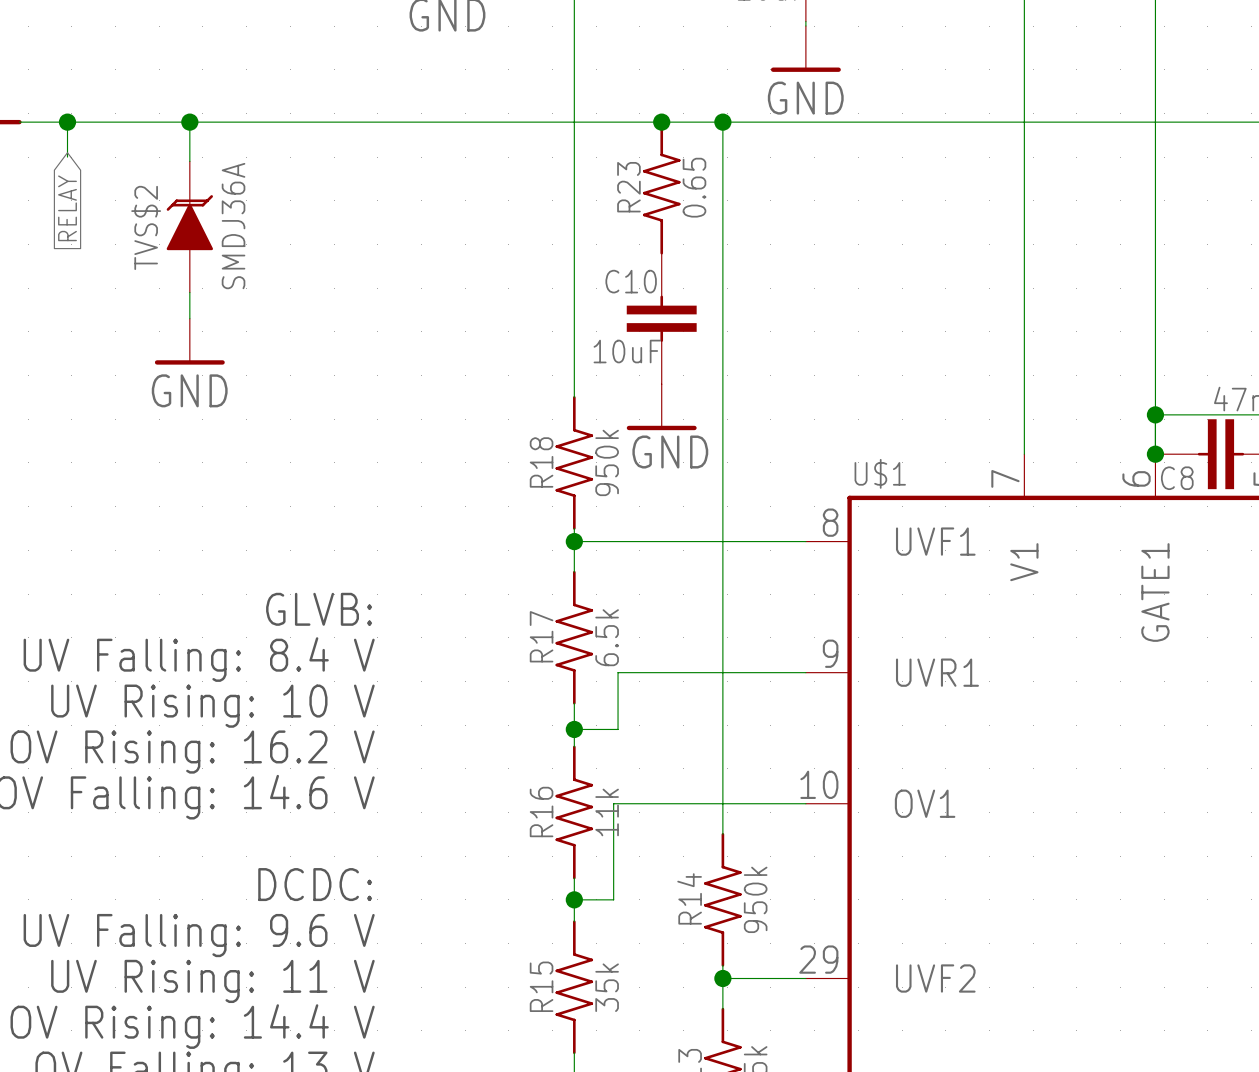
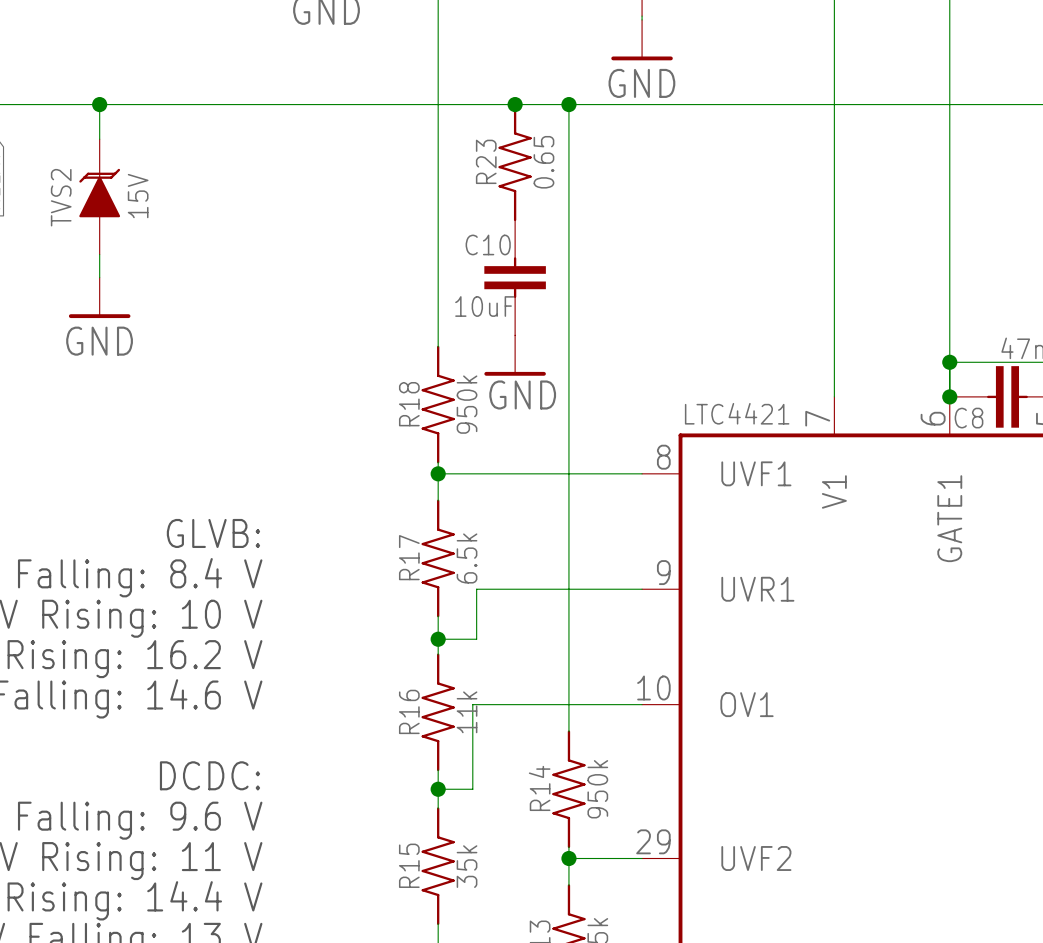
TVS$2 text: none -> 15V (138, 196)
TVS$2 value: SMDJ36A (233, 226) -> none
TVS$2 name: TVS$2 (146, 227) -> TVS2 (61, 197)
U$1 name: U$1 (880, 473) -> LTC4421 (737, 413)

